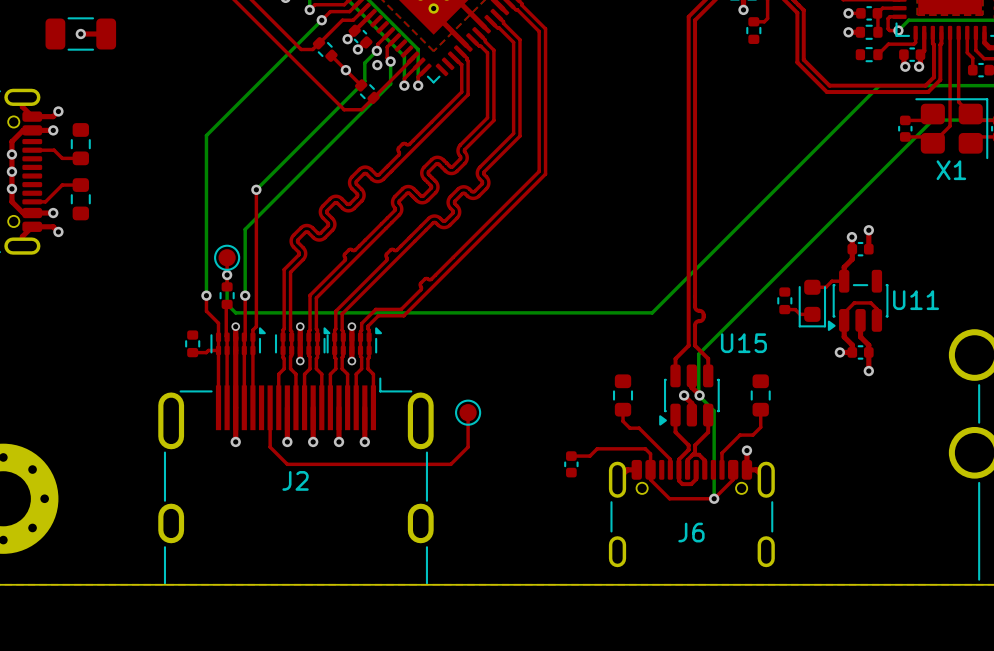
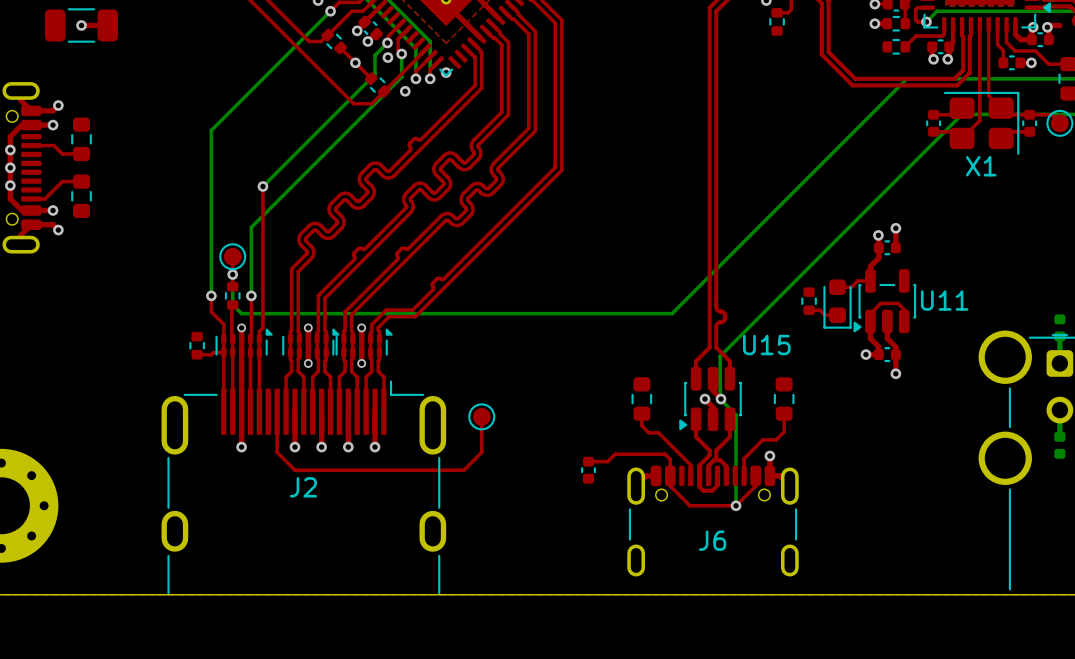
via: none -> (446, 72)
via: none -> (405, 91)

